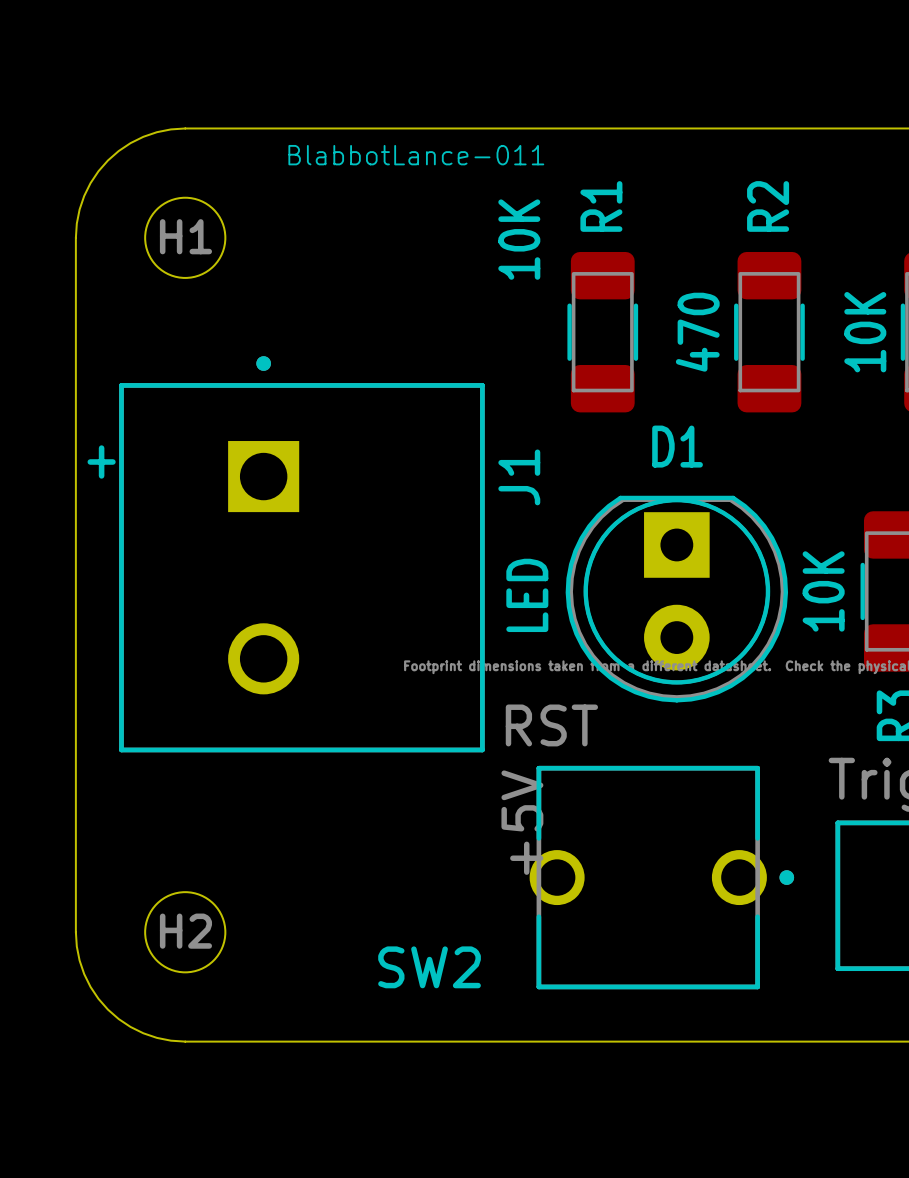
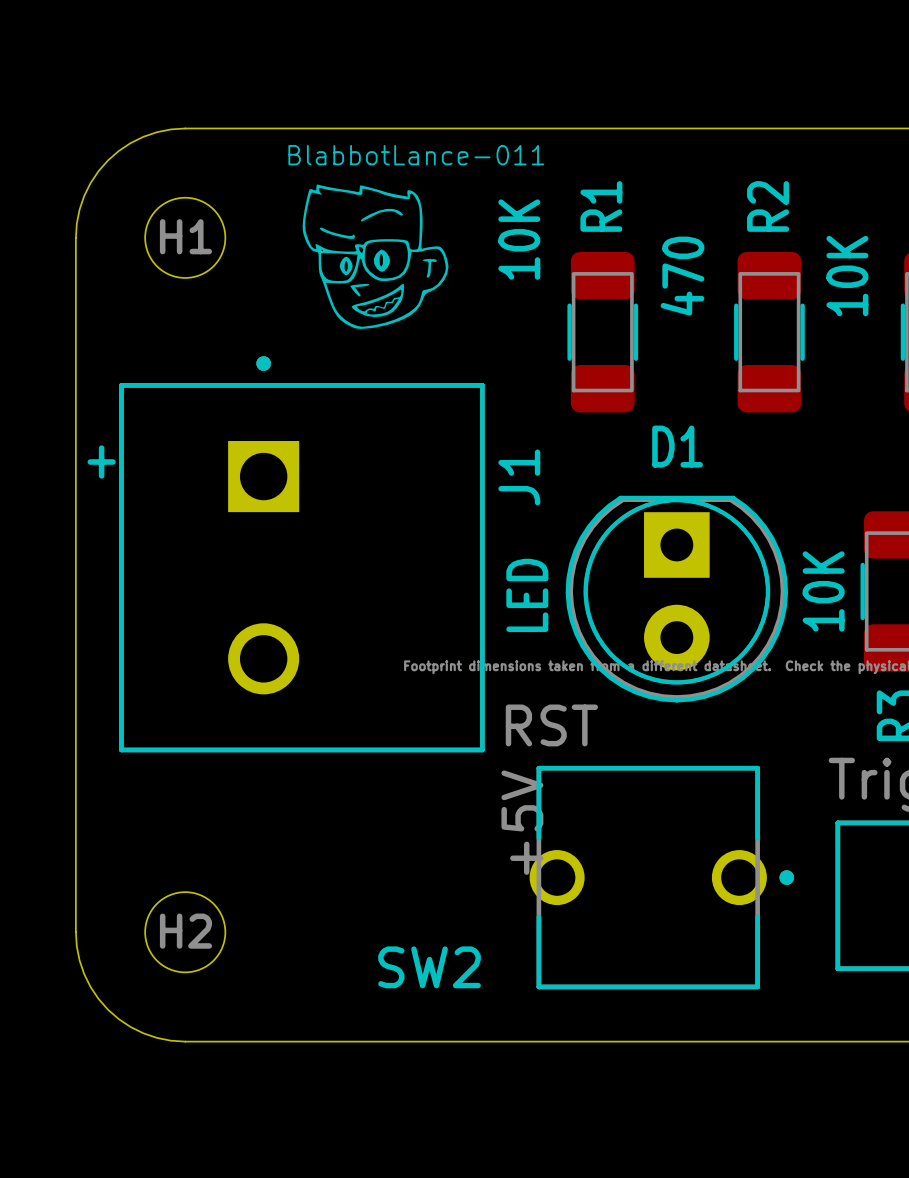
drawing: none -> [302, 184, 449, 329]
R2 value position: 470 (697, 332) -> 470 (682, 276)
part value position: 10K (865, 332) -> 10K (847, 276)

